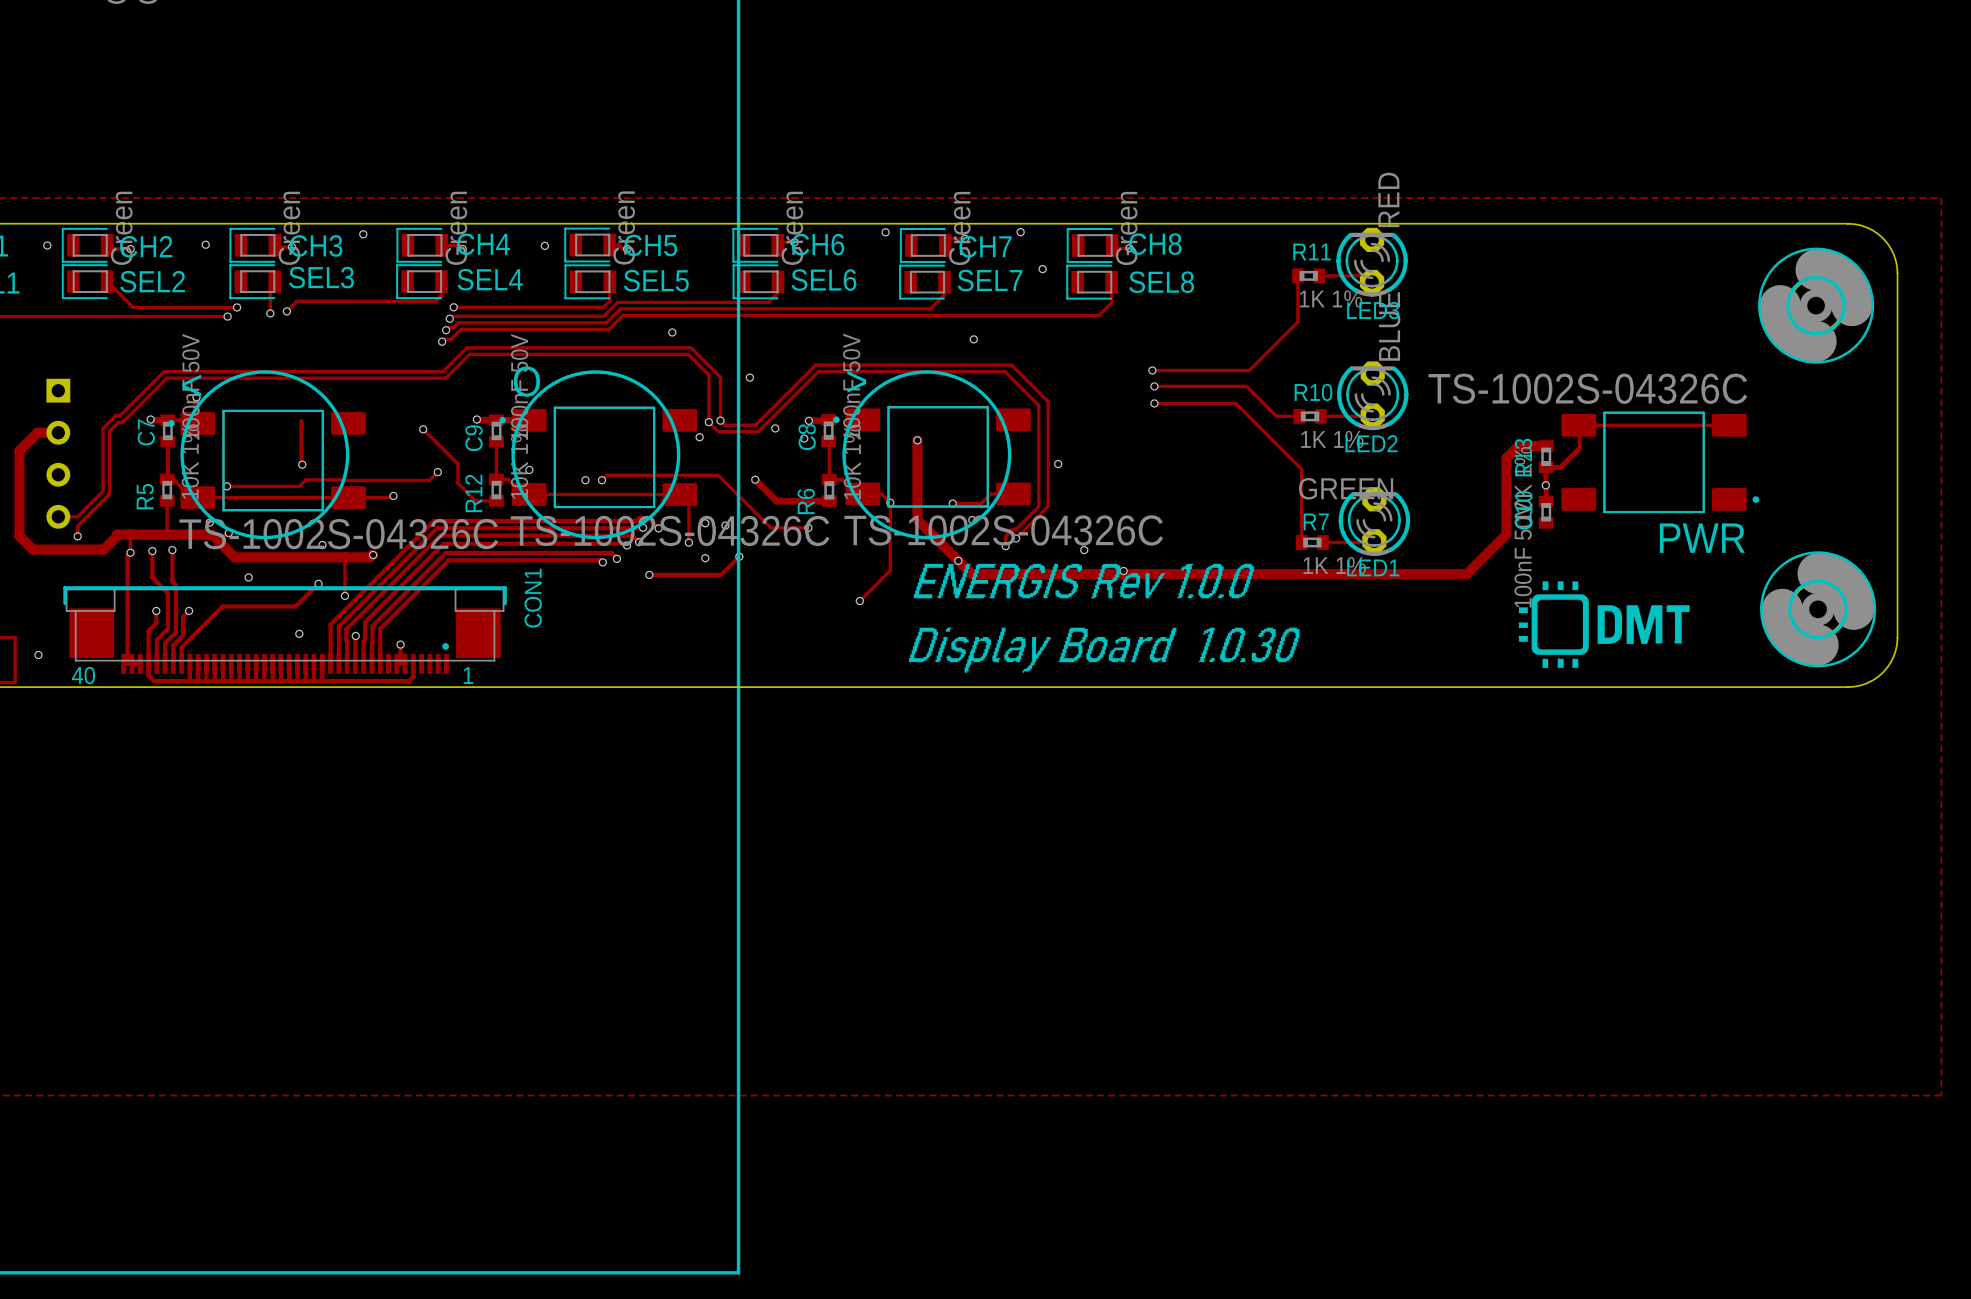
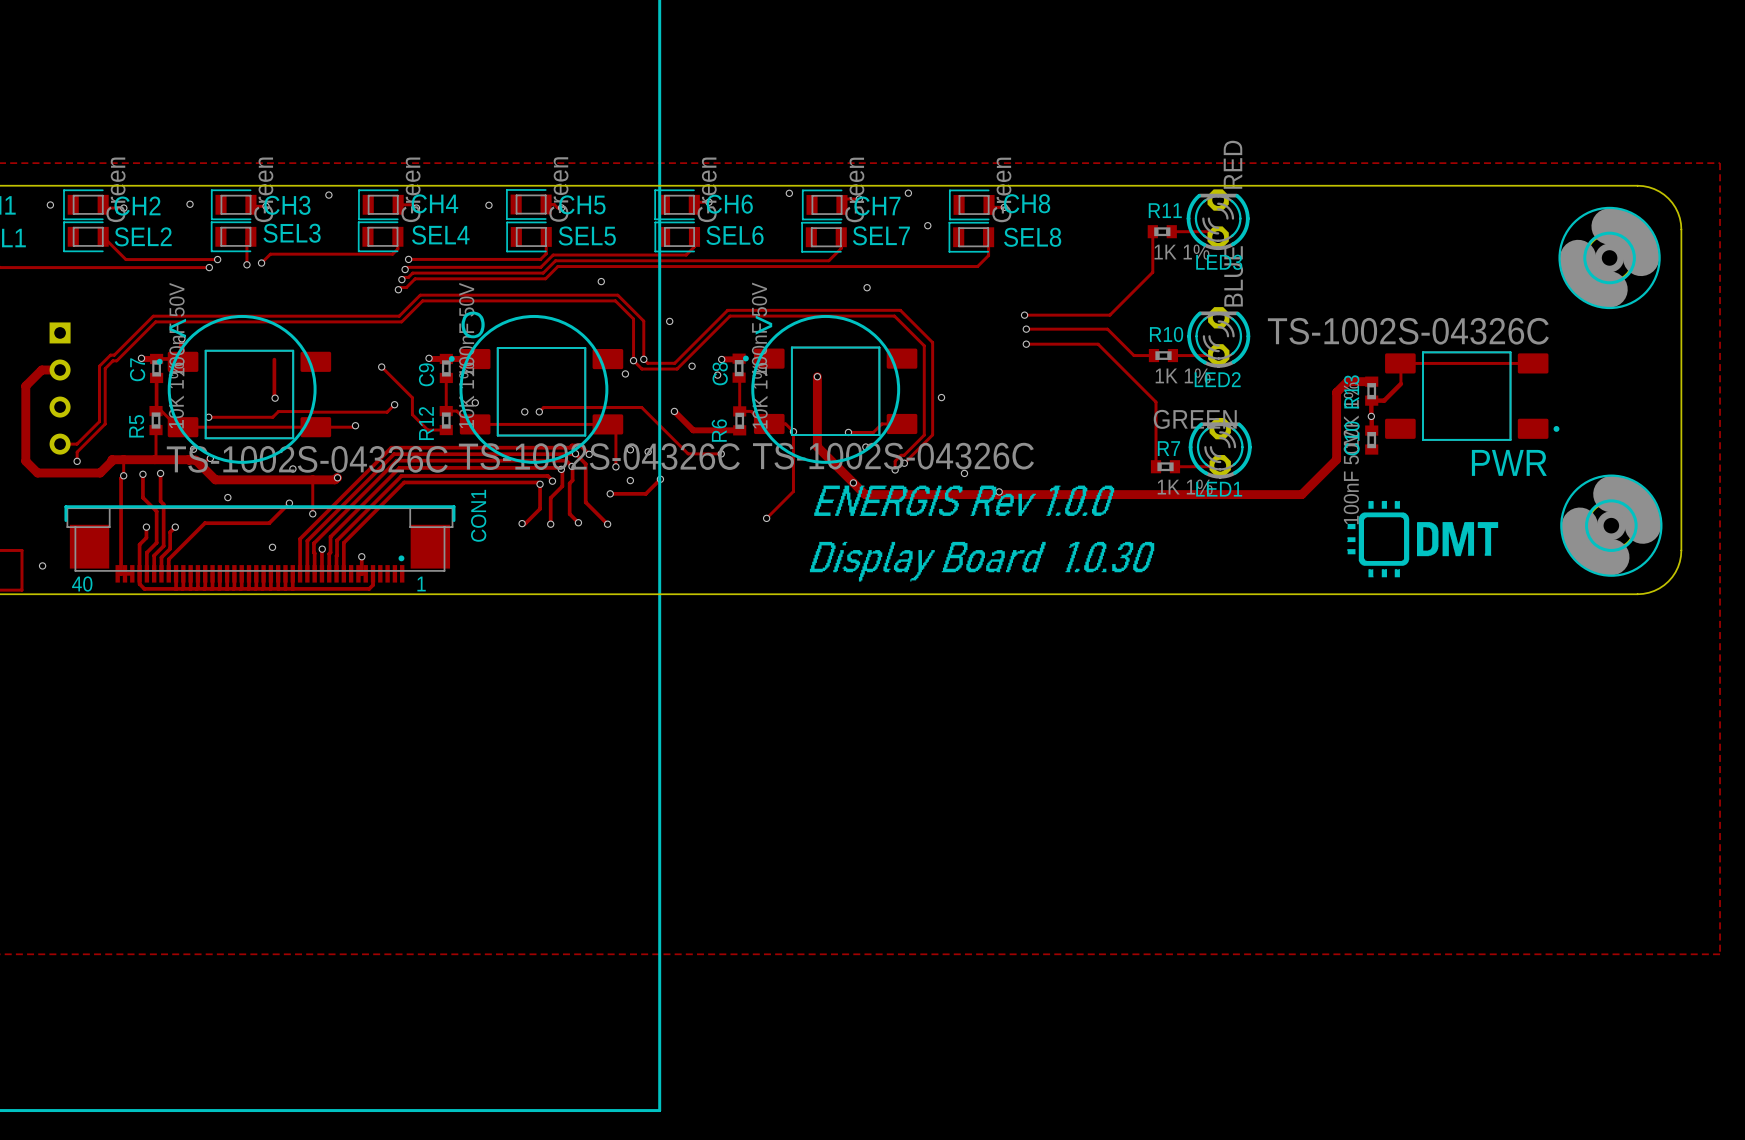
track: none -> (575, 453) (585, 463) (585, 502) (607, 524)
track: none -> (572, 466) (572, 480) (569, 483) (569, 513) (578, 522)
track: none -> (561, 469) (562, 486) (550, 497) (550, 524)
track: none -> (540, 484) (540, 508) (525, 523) (522, 523)
via: none -> (610, 493)
track: (722, 573) (721, 574) (649, 574) -> (645, 493) (610, 493)
via: (649, 574) -> none
via: none -> (578, 522)
via: none -> (522, 523)
via: none -> (550, 524)
via: none -> (607, 524)

